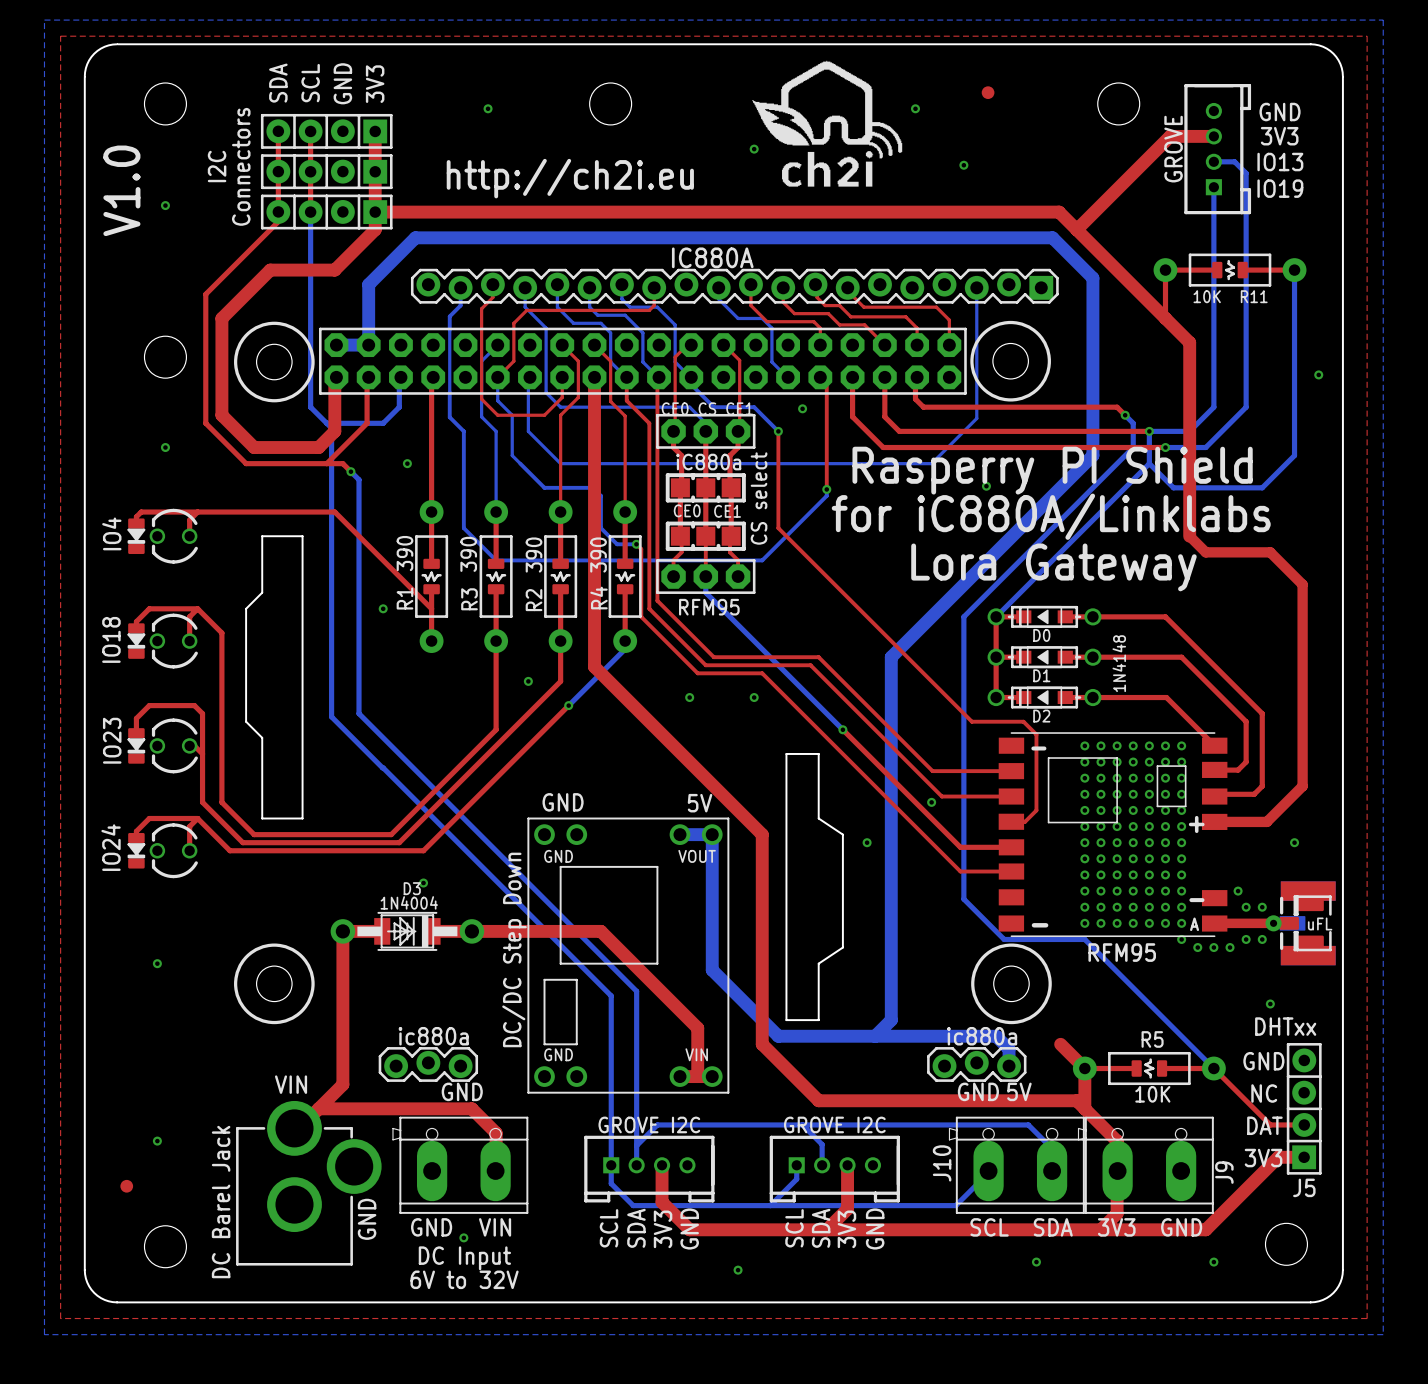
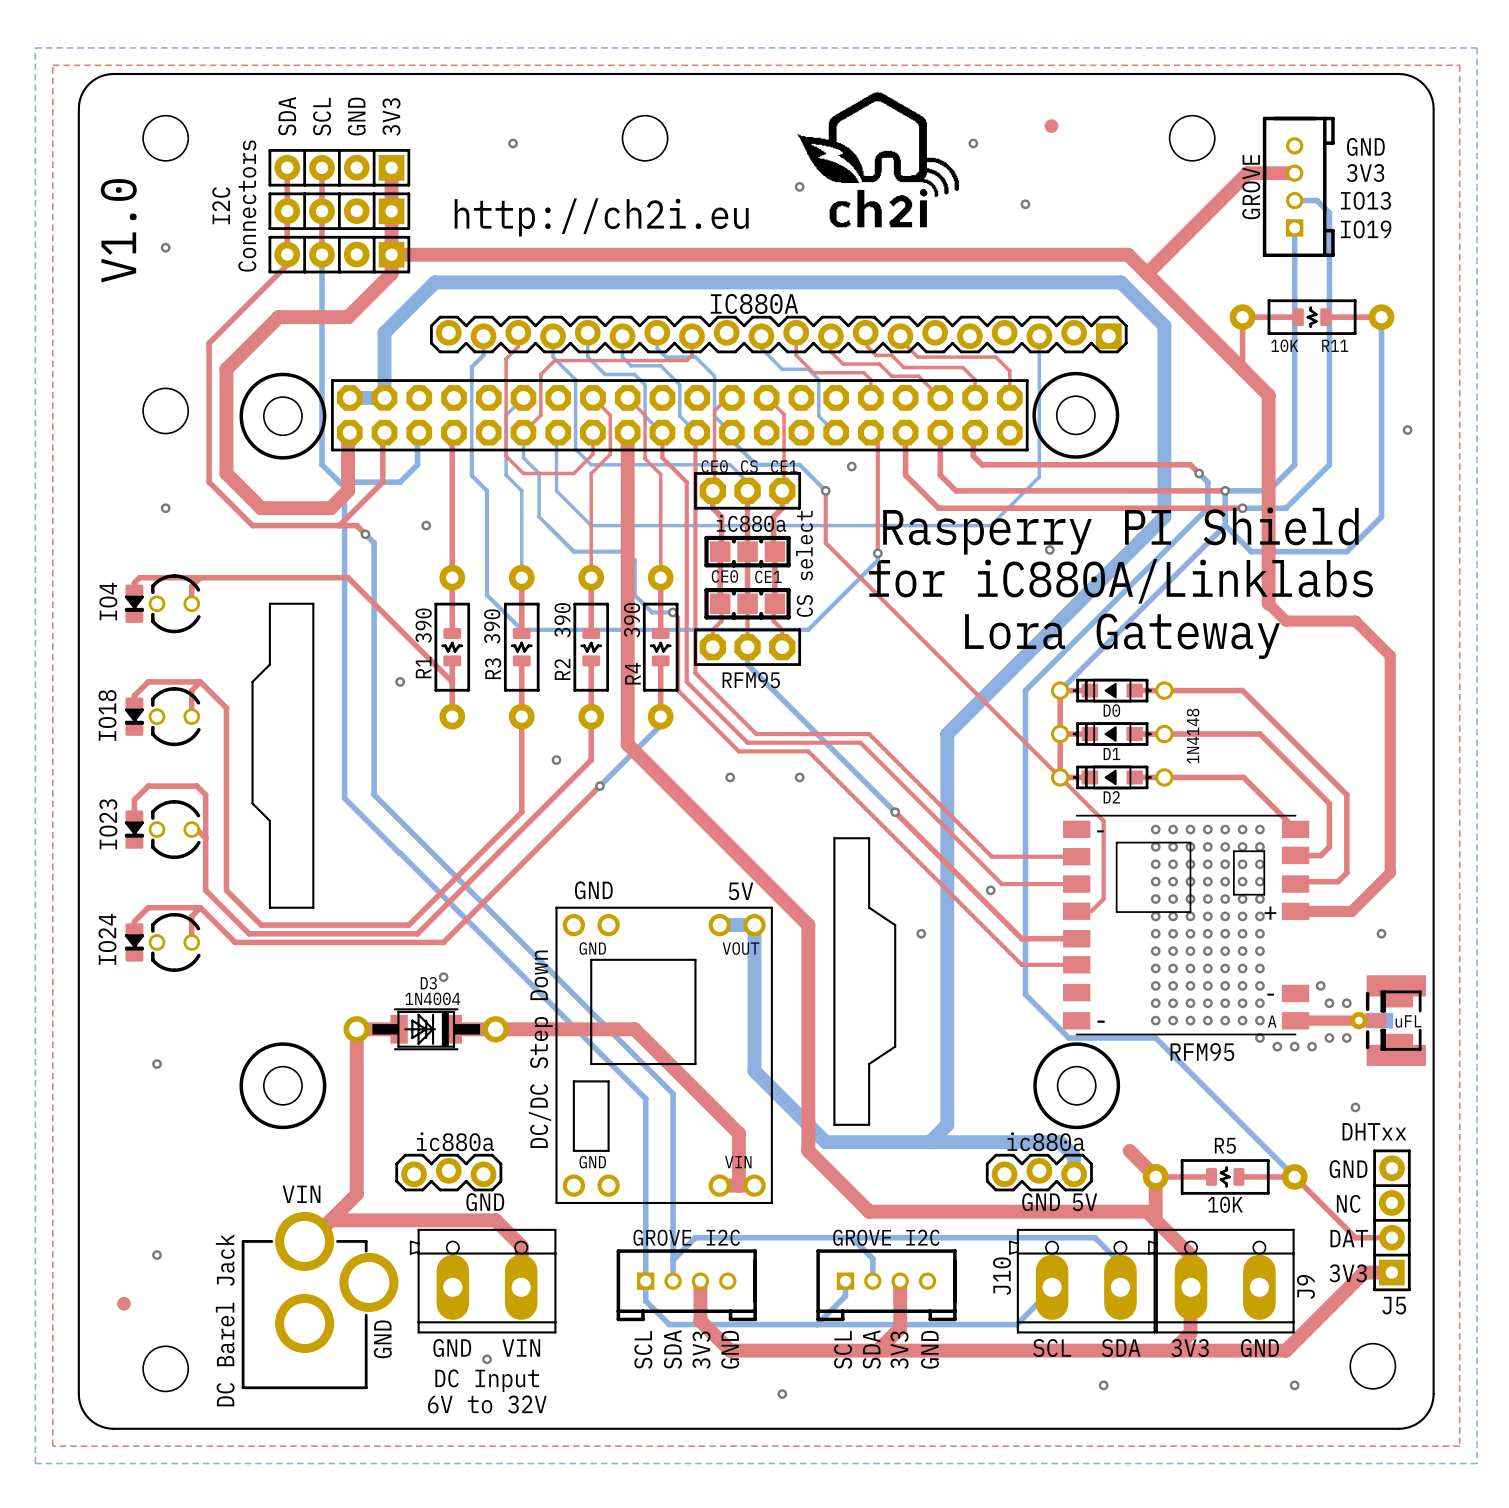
top track: (778, 479) (778, 528) (971, 721) (1023, 721) (1036, 734) (1036, 737) -> (825, 542) (1103, 820)

